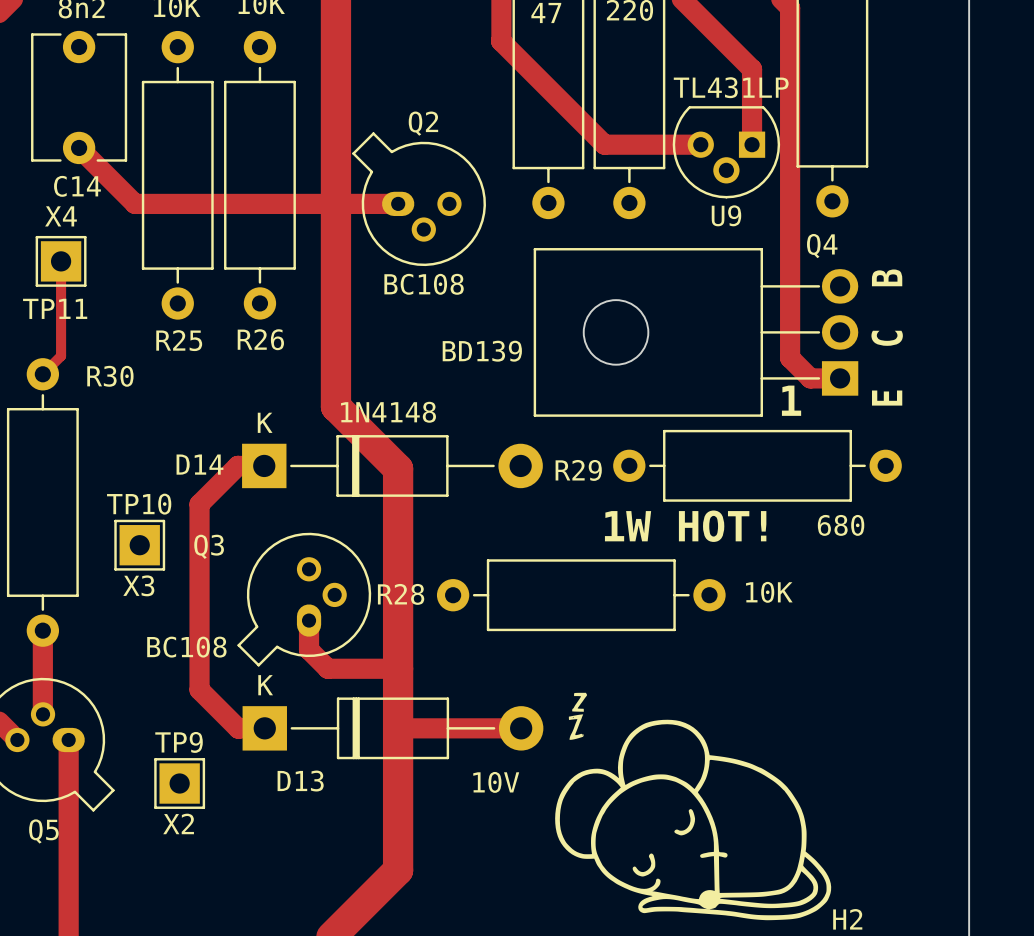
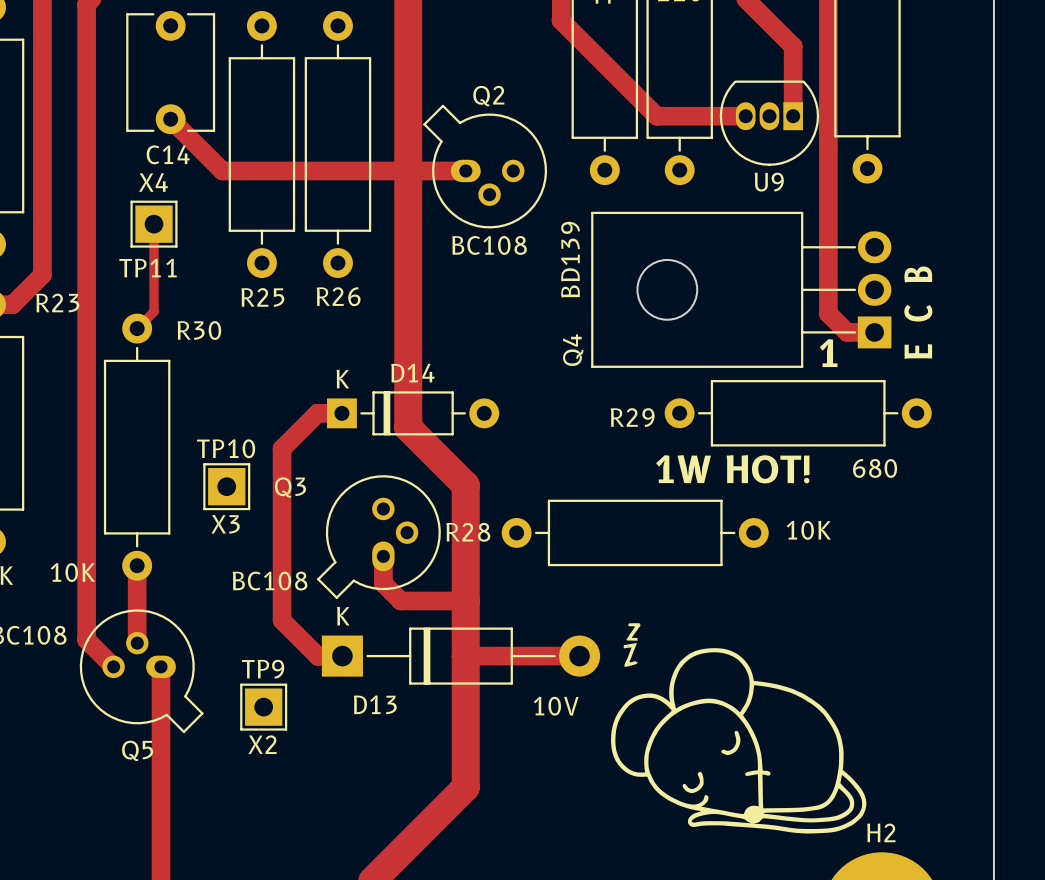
U9 value: TL431LP (731, 87) -> none
U9 footprint: [672, 106, 781, 199] -> [719, 80, 820, 166]
Q4 name rotation: 0° (822, 246) -> 90° counterclockwise (573, 350)
Q4 name position: Q4 (822, 246) -> Q4 (573, 350)
Q4 value rotation: 0° (482, 351) -> 90° counterclockwise (570, 259)
track: (335, 406) (398, 468) (398, 543) -> (408, 358) (408, 427) (465, 485)
D14 value: 1N4148 (388, 412) -> none
D14 footprint: [242, 435, 543, 497] -> [327, 391, 500, 436]
D14 name position: D14 (199, 464) -> D14 (412, 373)

